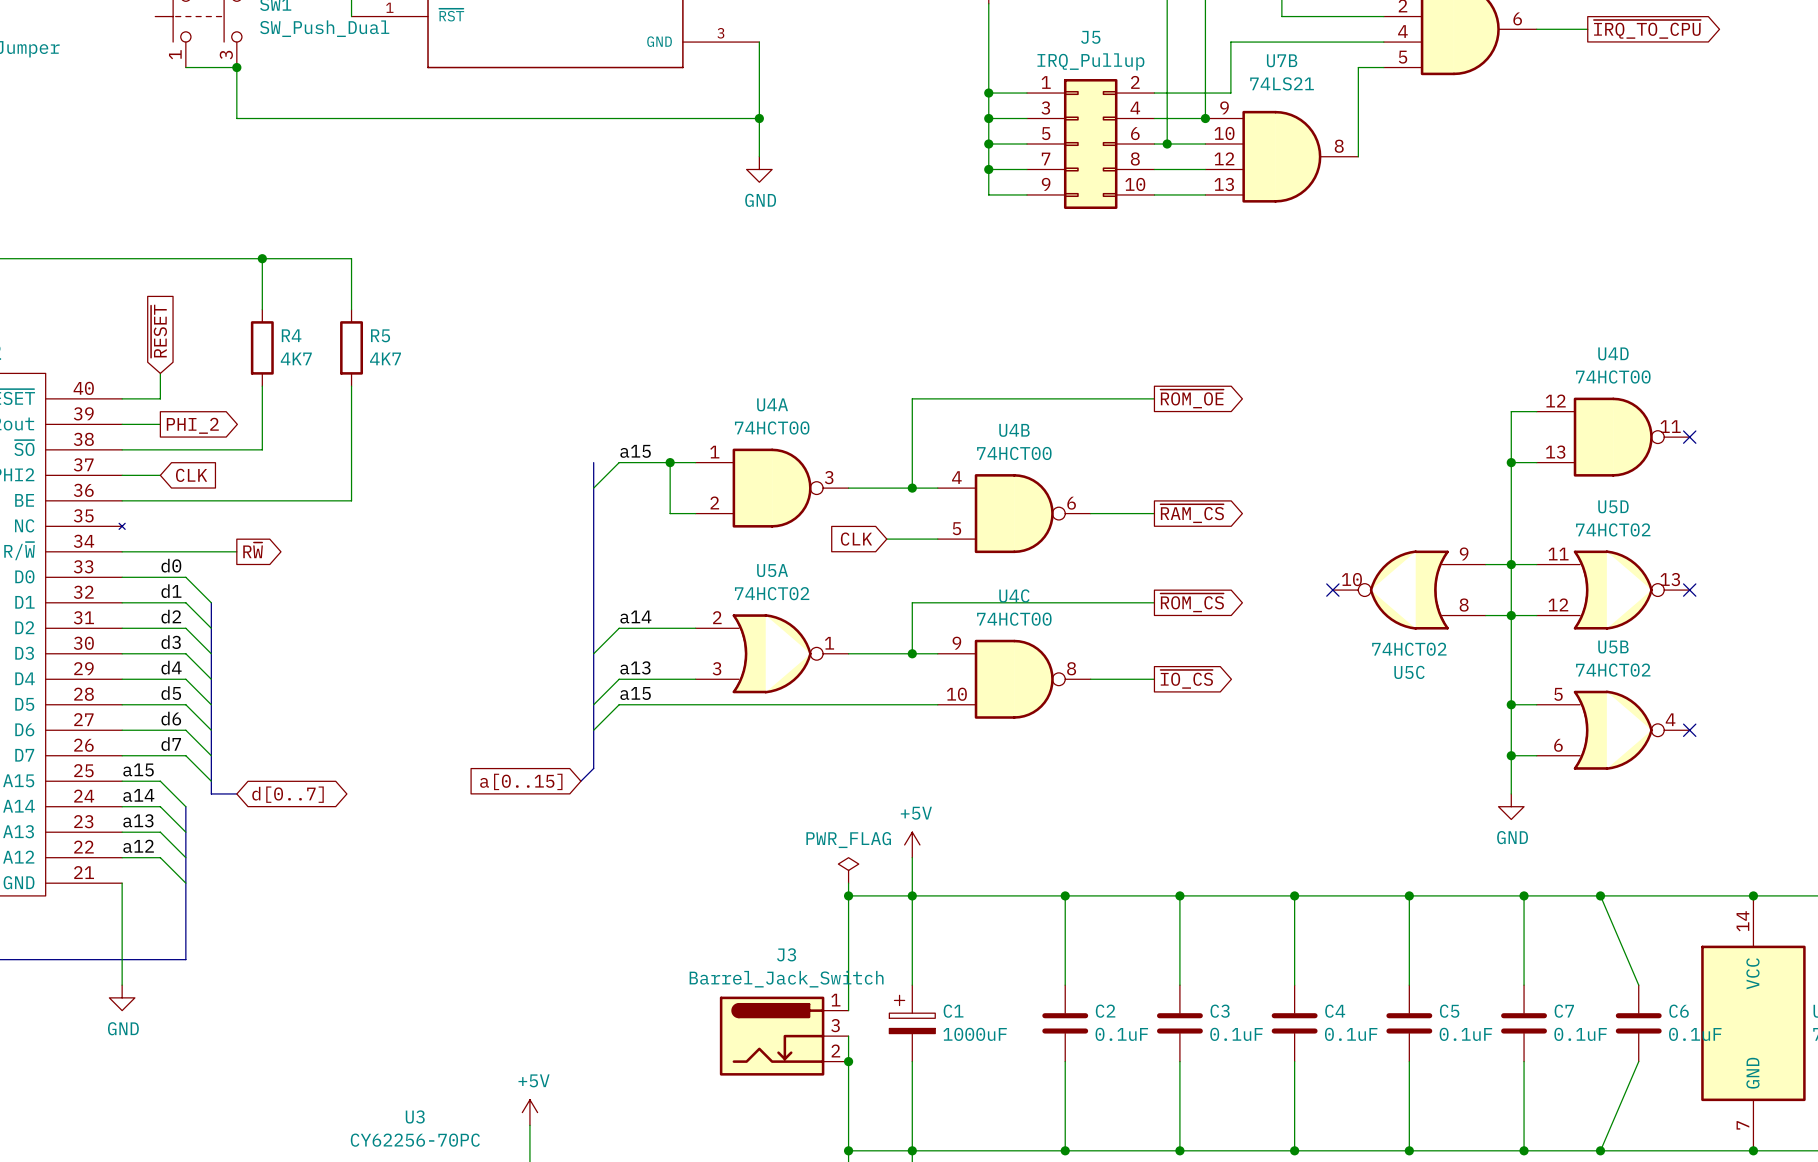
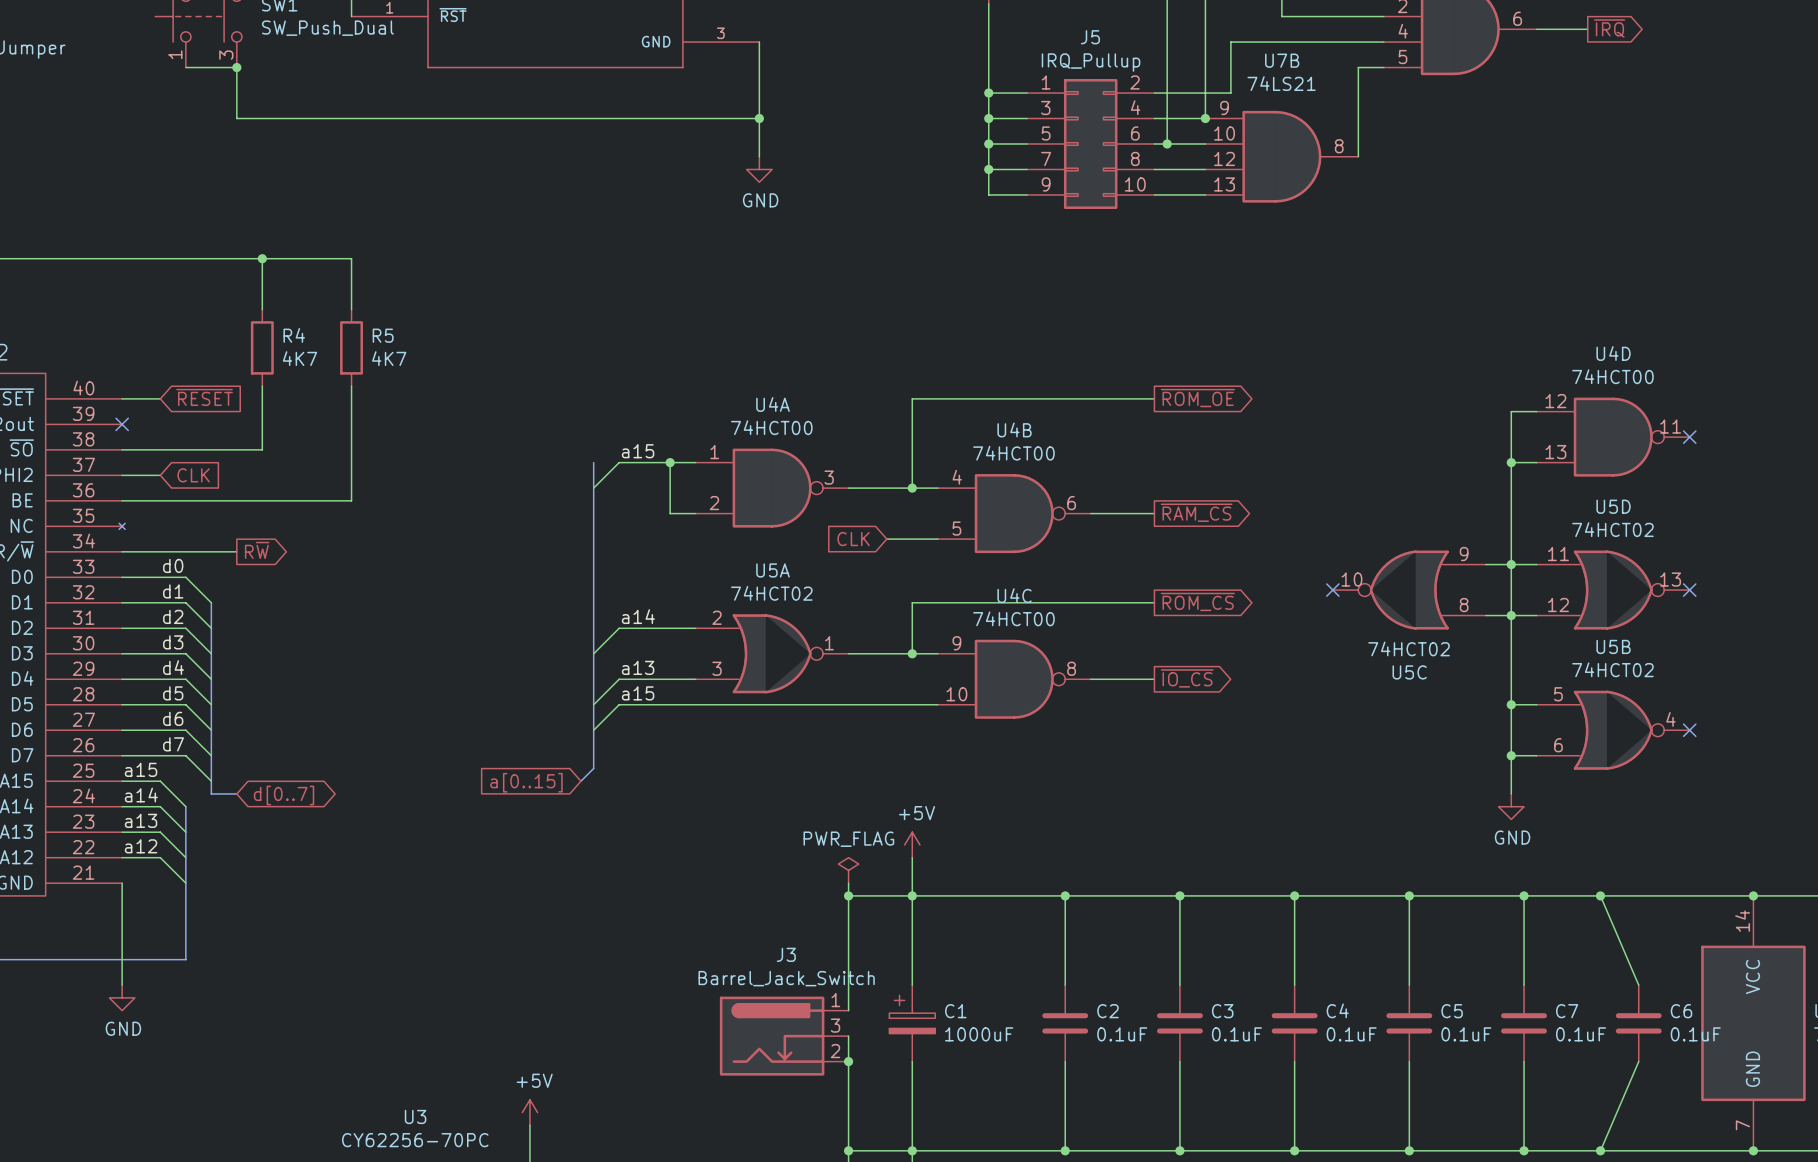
global label: ~{IRQ_TO_CPU} (1647, 29) -> ~{IRQ} (1609, 28)
global label rotation: 0° (159, 331) -> 90° clockwise (204, 397)
wire: (160, 373) (160, 398) -> none
wire: (122, 424) (160, 424) -> none
no-connect mark: none -> (122, 424)
global label: PHI_2 (192, 425) -> none

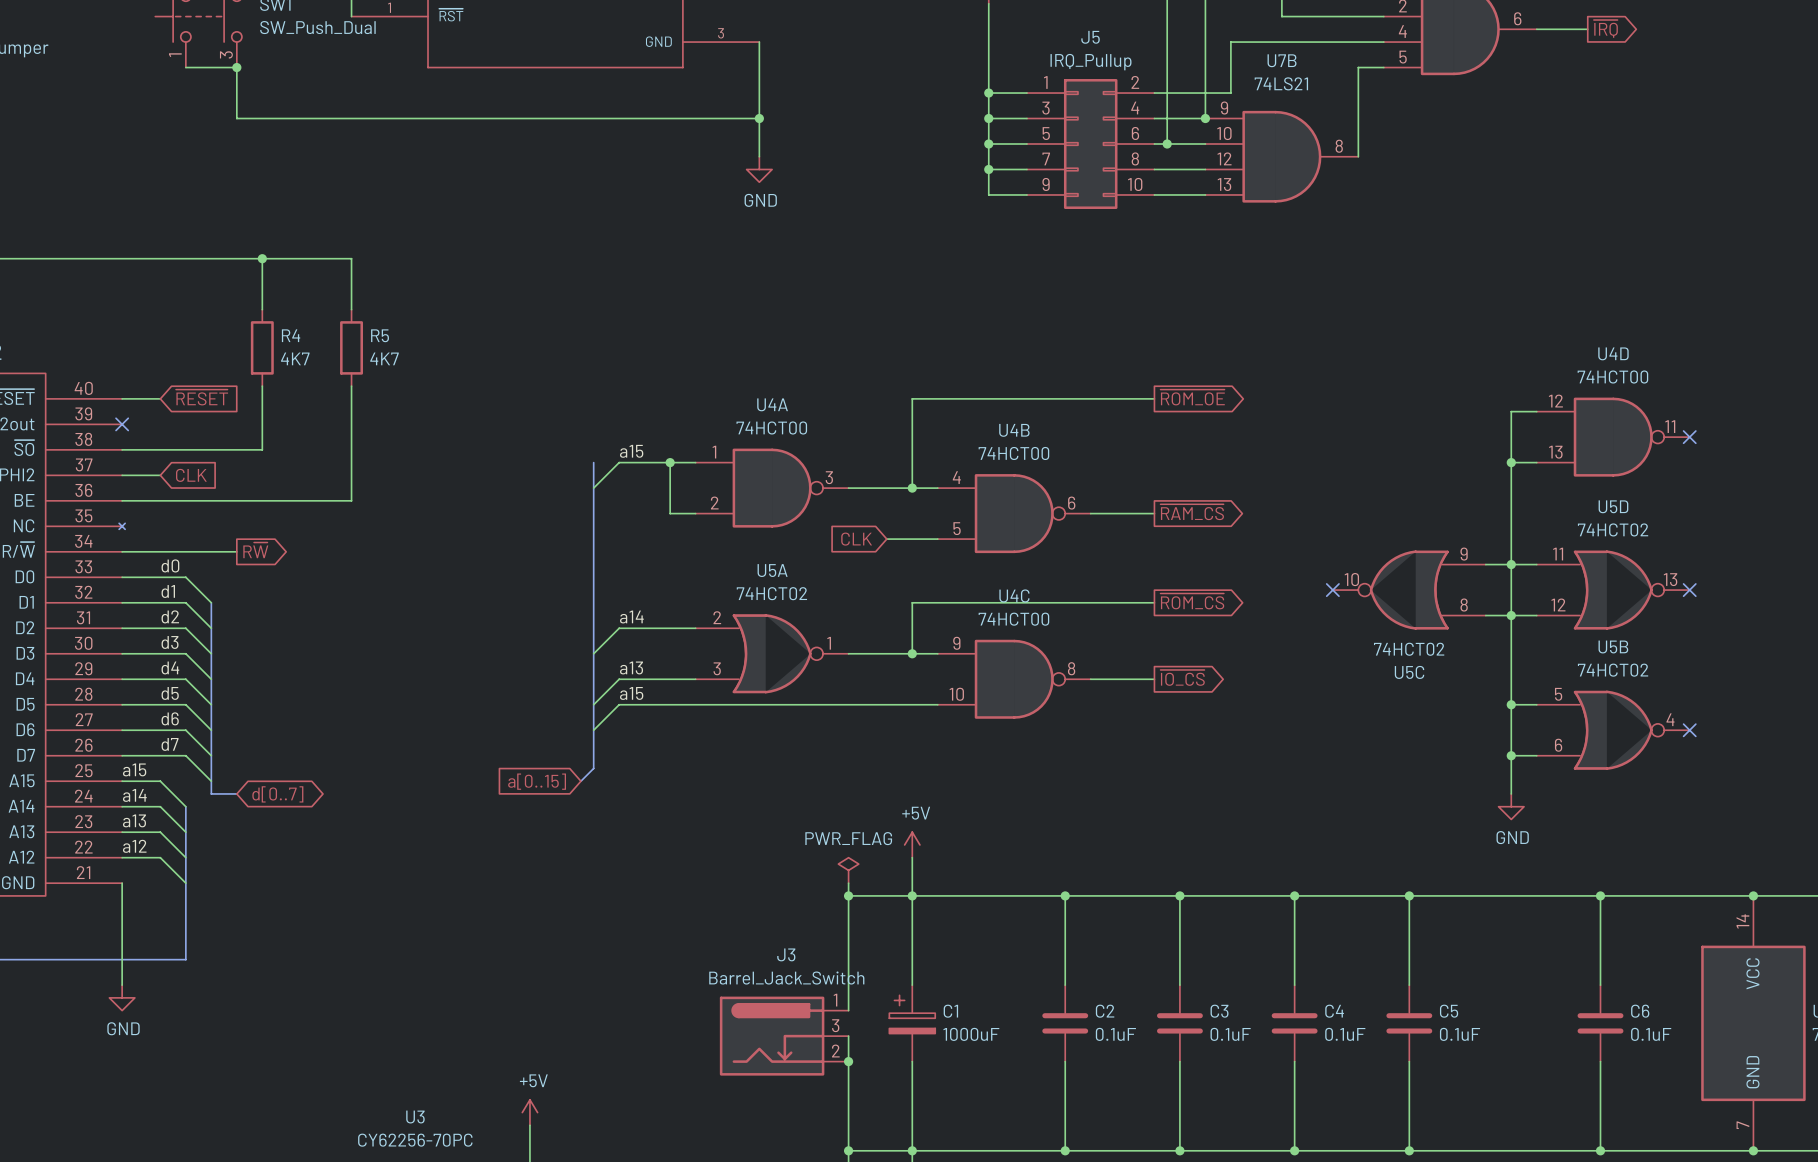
wire: (1524, 895) (1524, 985) -> none
junction: (1524, 895) -> none
wire: (1600, 895) (1638, 985) -> (1600, 895) (1600, 985)
C7: 0.1uF (1524, 1023) -> none
C6 position: (1638, 1023) -> (1600, 1023)
wire: (1524, 1061) (1524, 1150) -> none
wire: (1638, 1061) (1600, 1150) -> (1600, 1061) (1600, 1150)
junction: (1524, 1150) -> none

